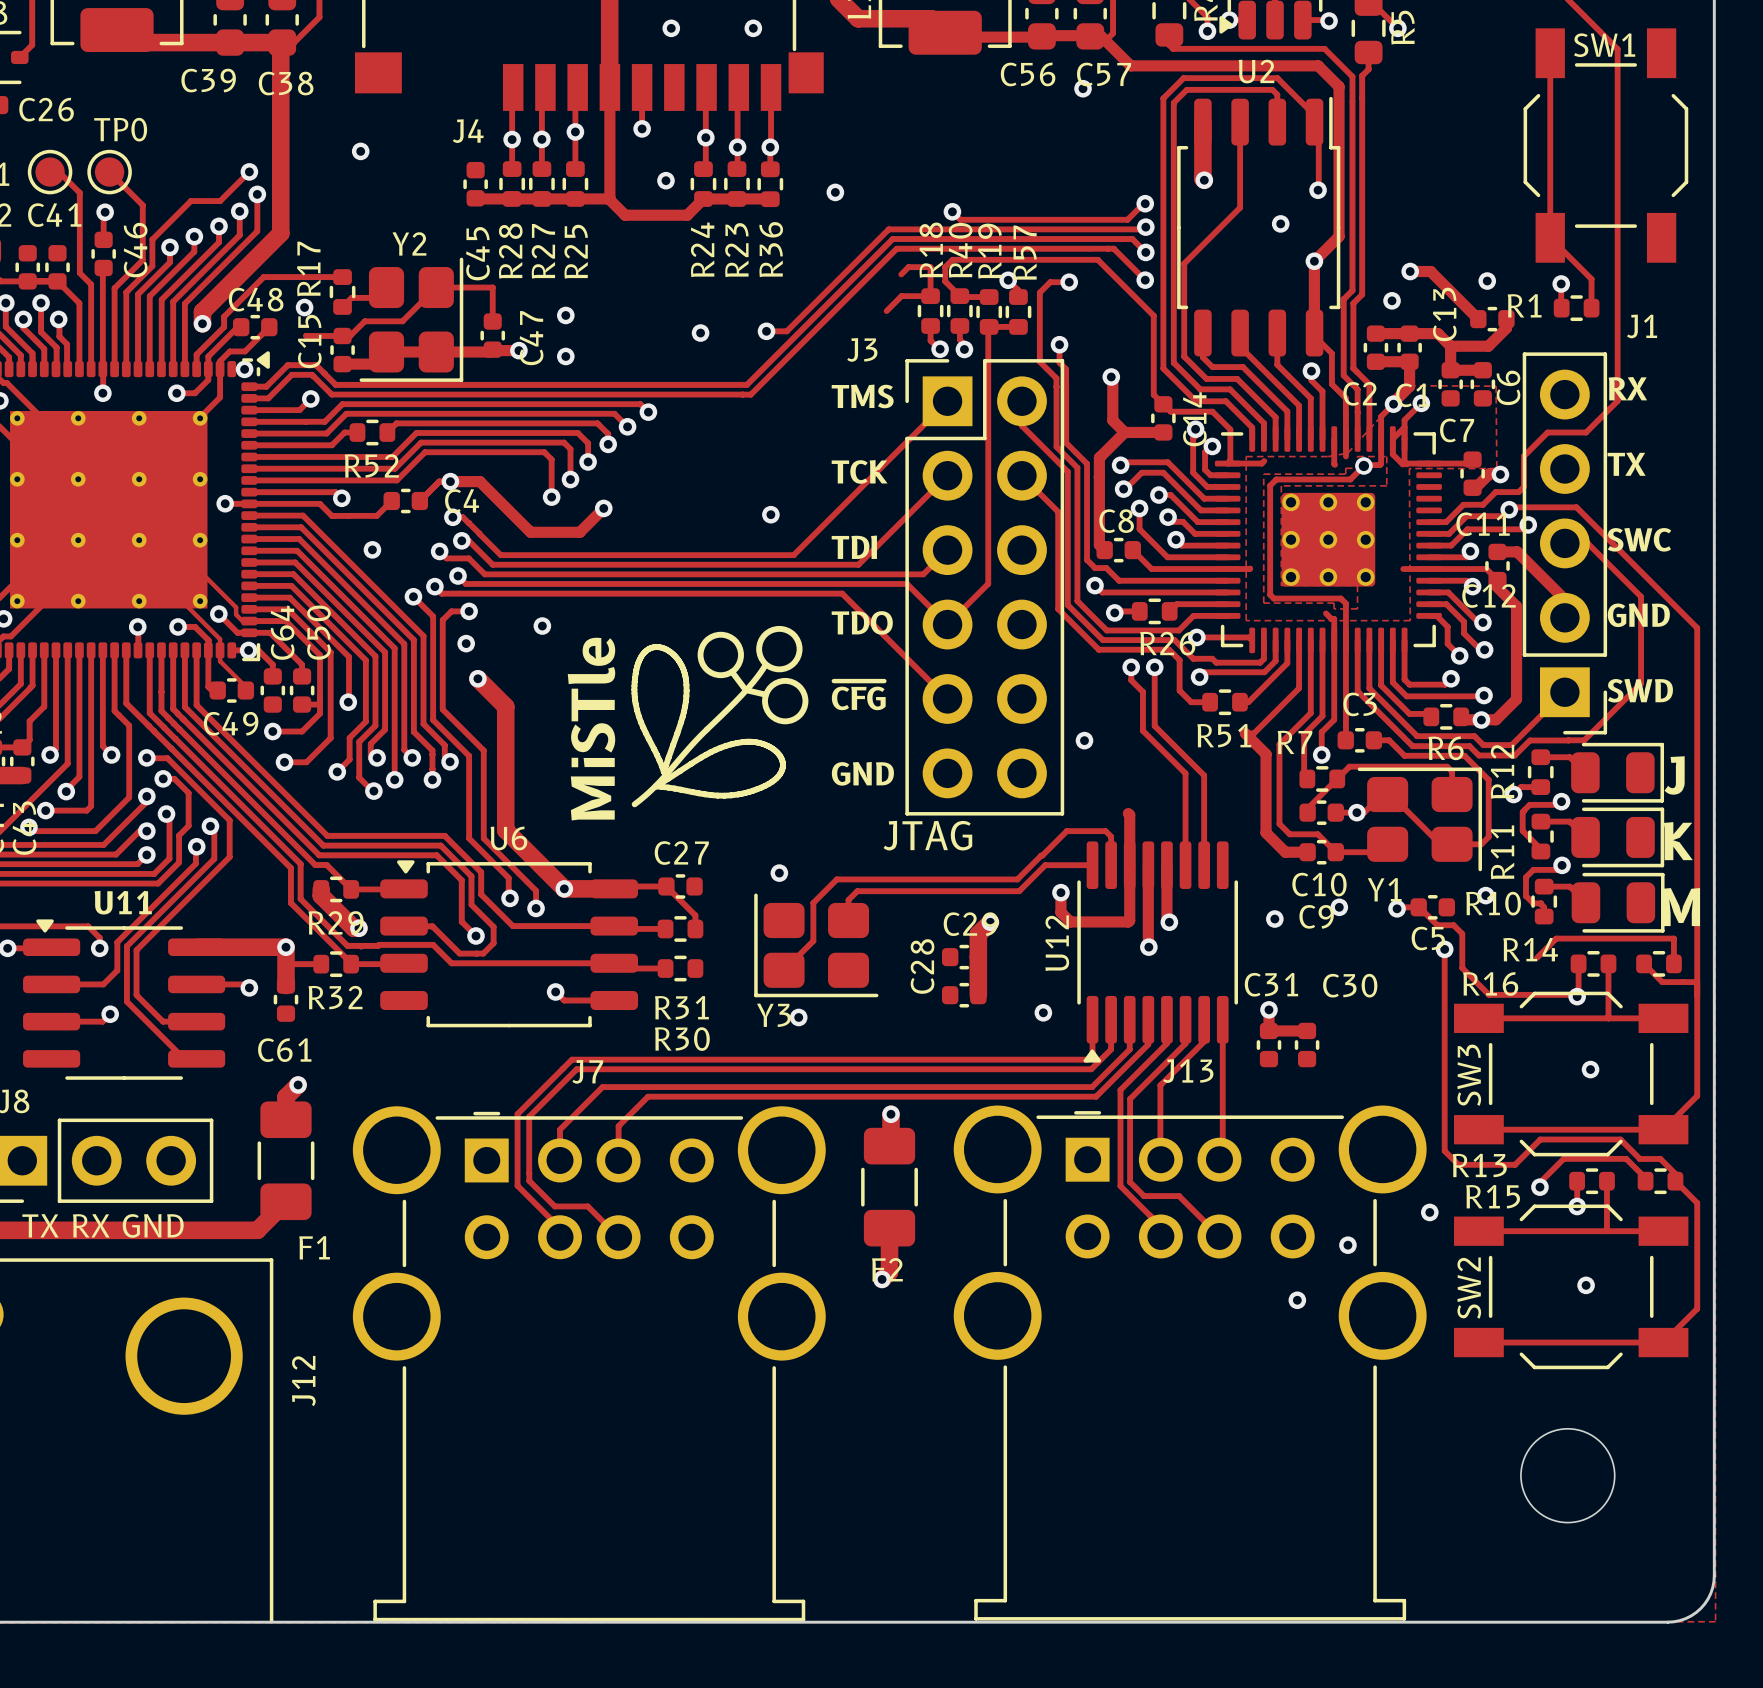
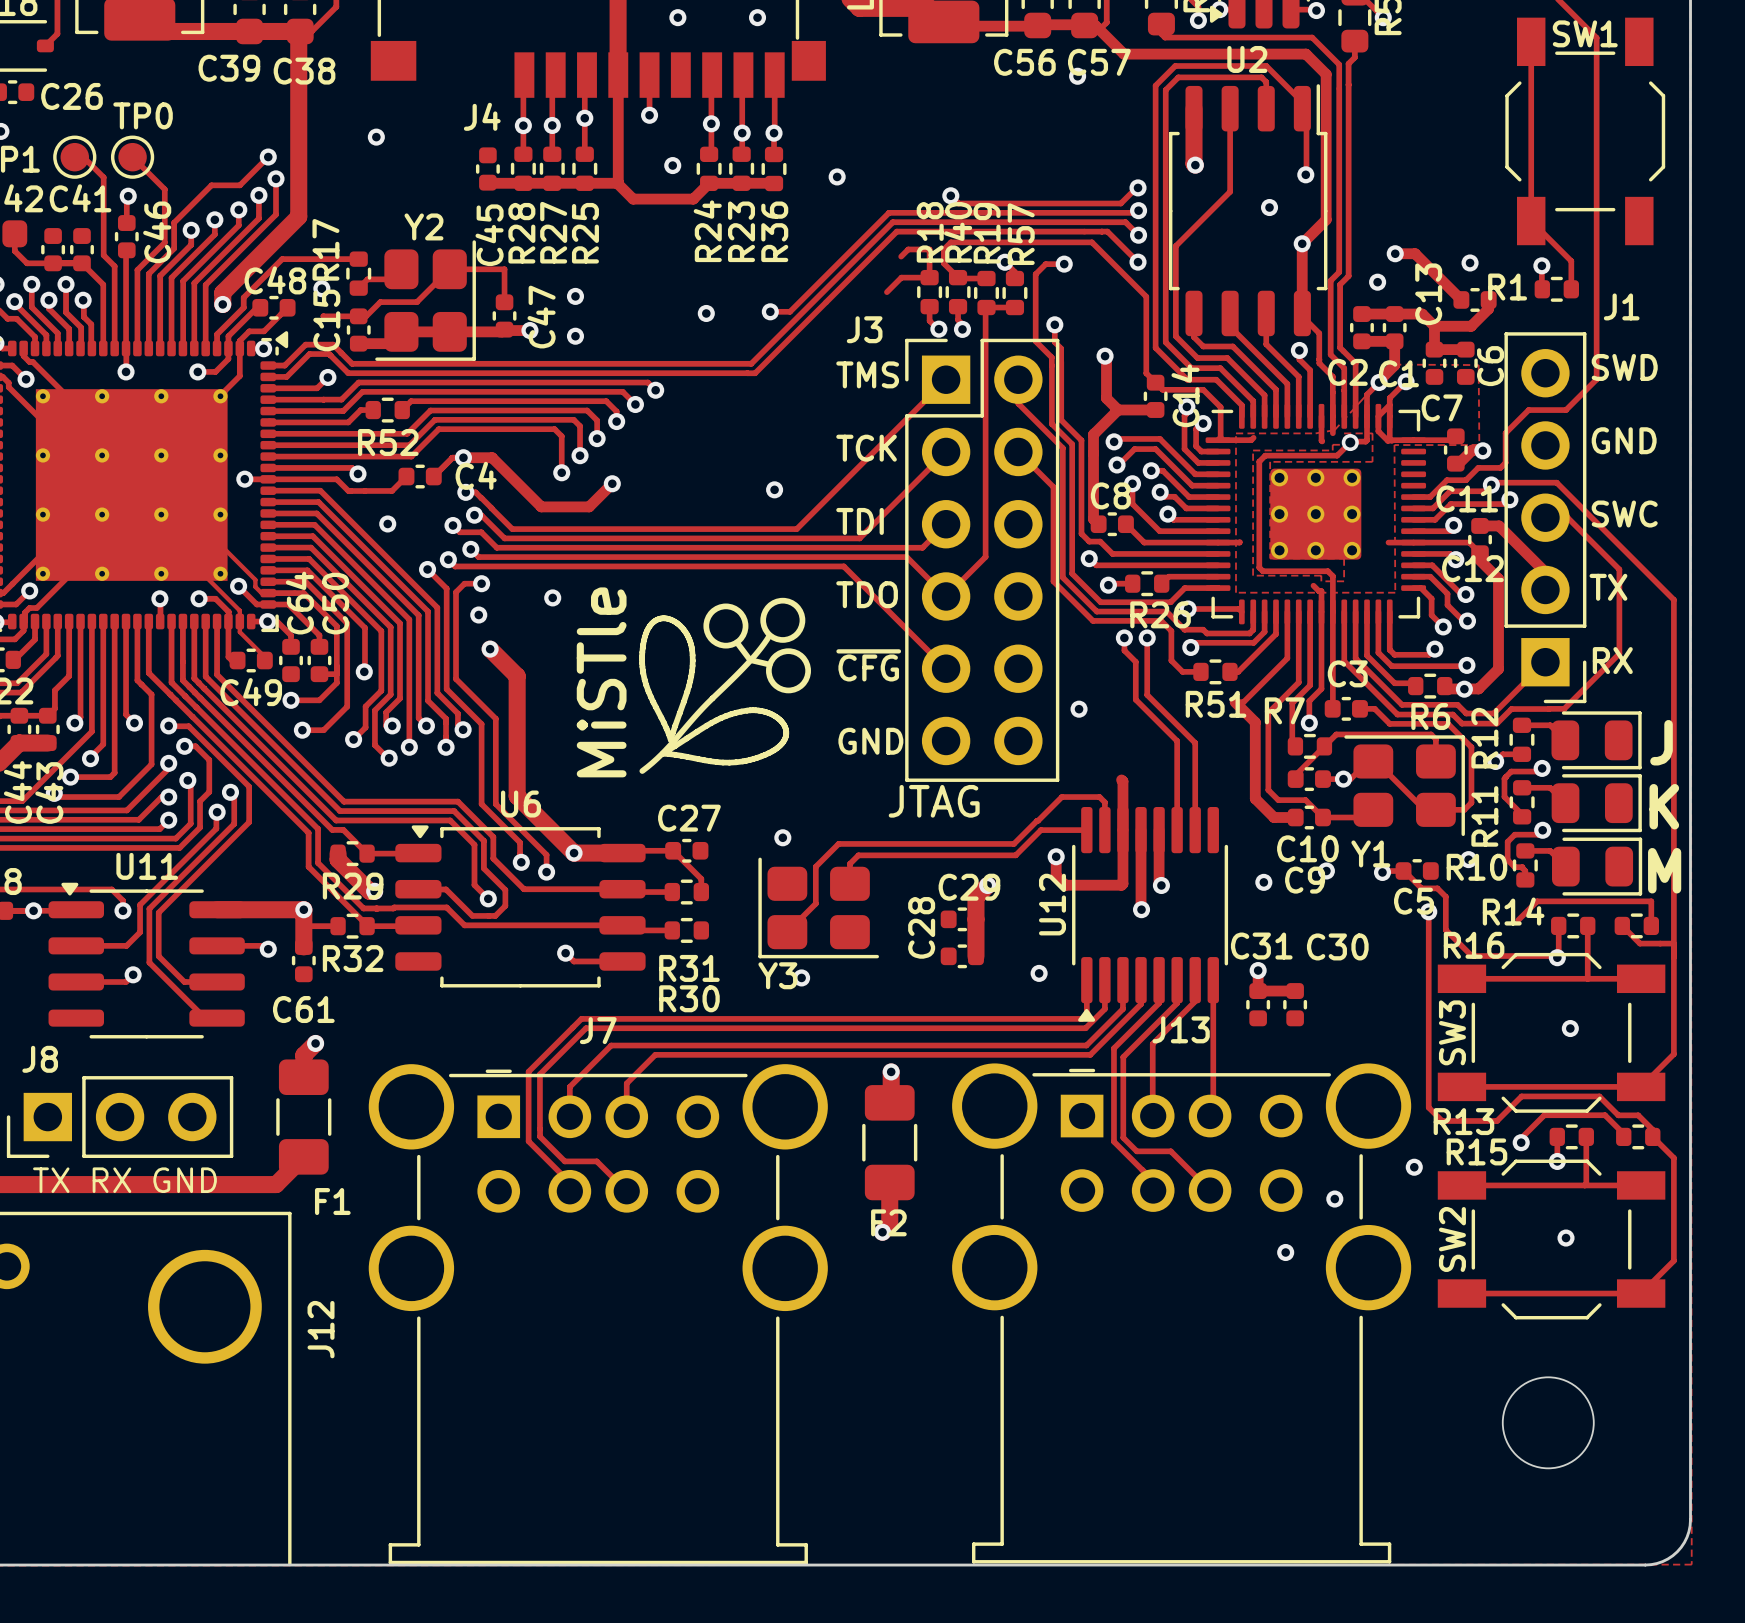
text: RX (1627, 388) -> SWD (1624, 367)
text: TX (1626, 464) -> GND (1624, 440)
text: GND (1638, 615) -> TX (1608, 587)
text: SWD (1640, 690) -> RX (1612, 660)

